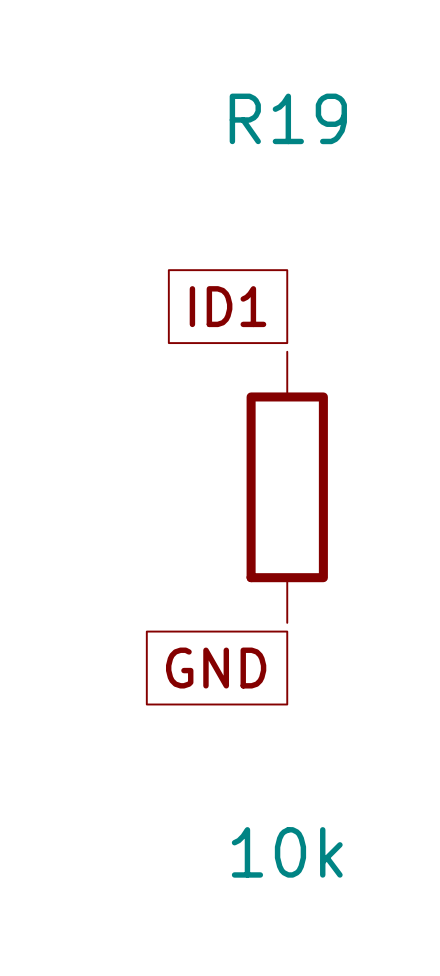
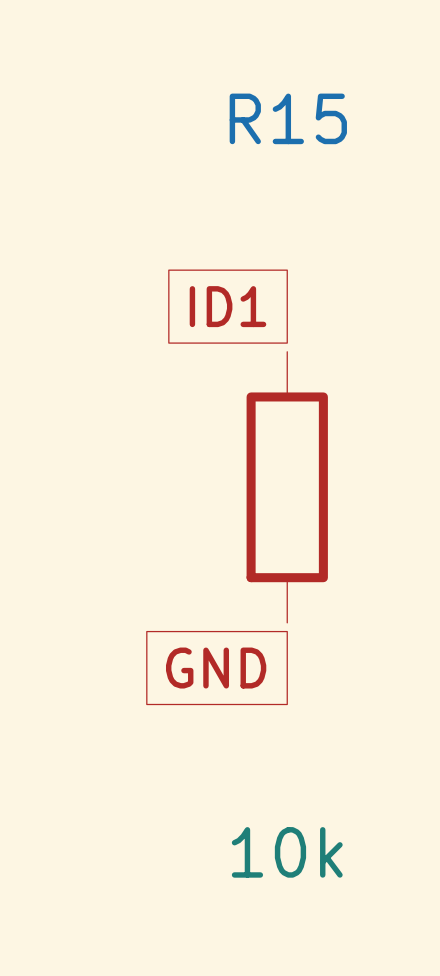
R19 name: R19 (288, 118) -> R15 (288, 118)

